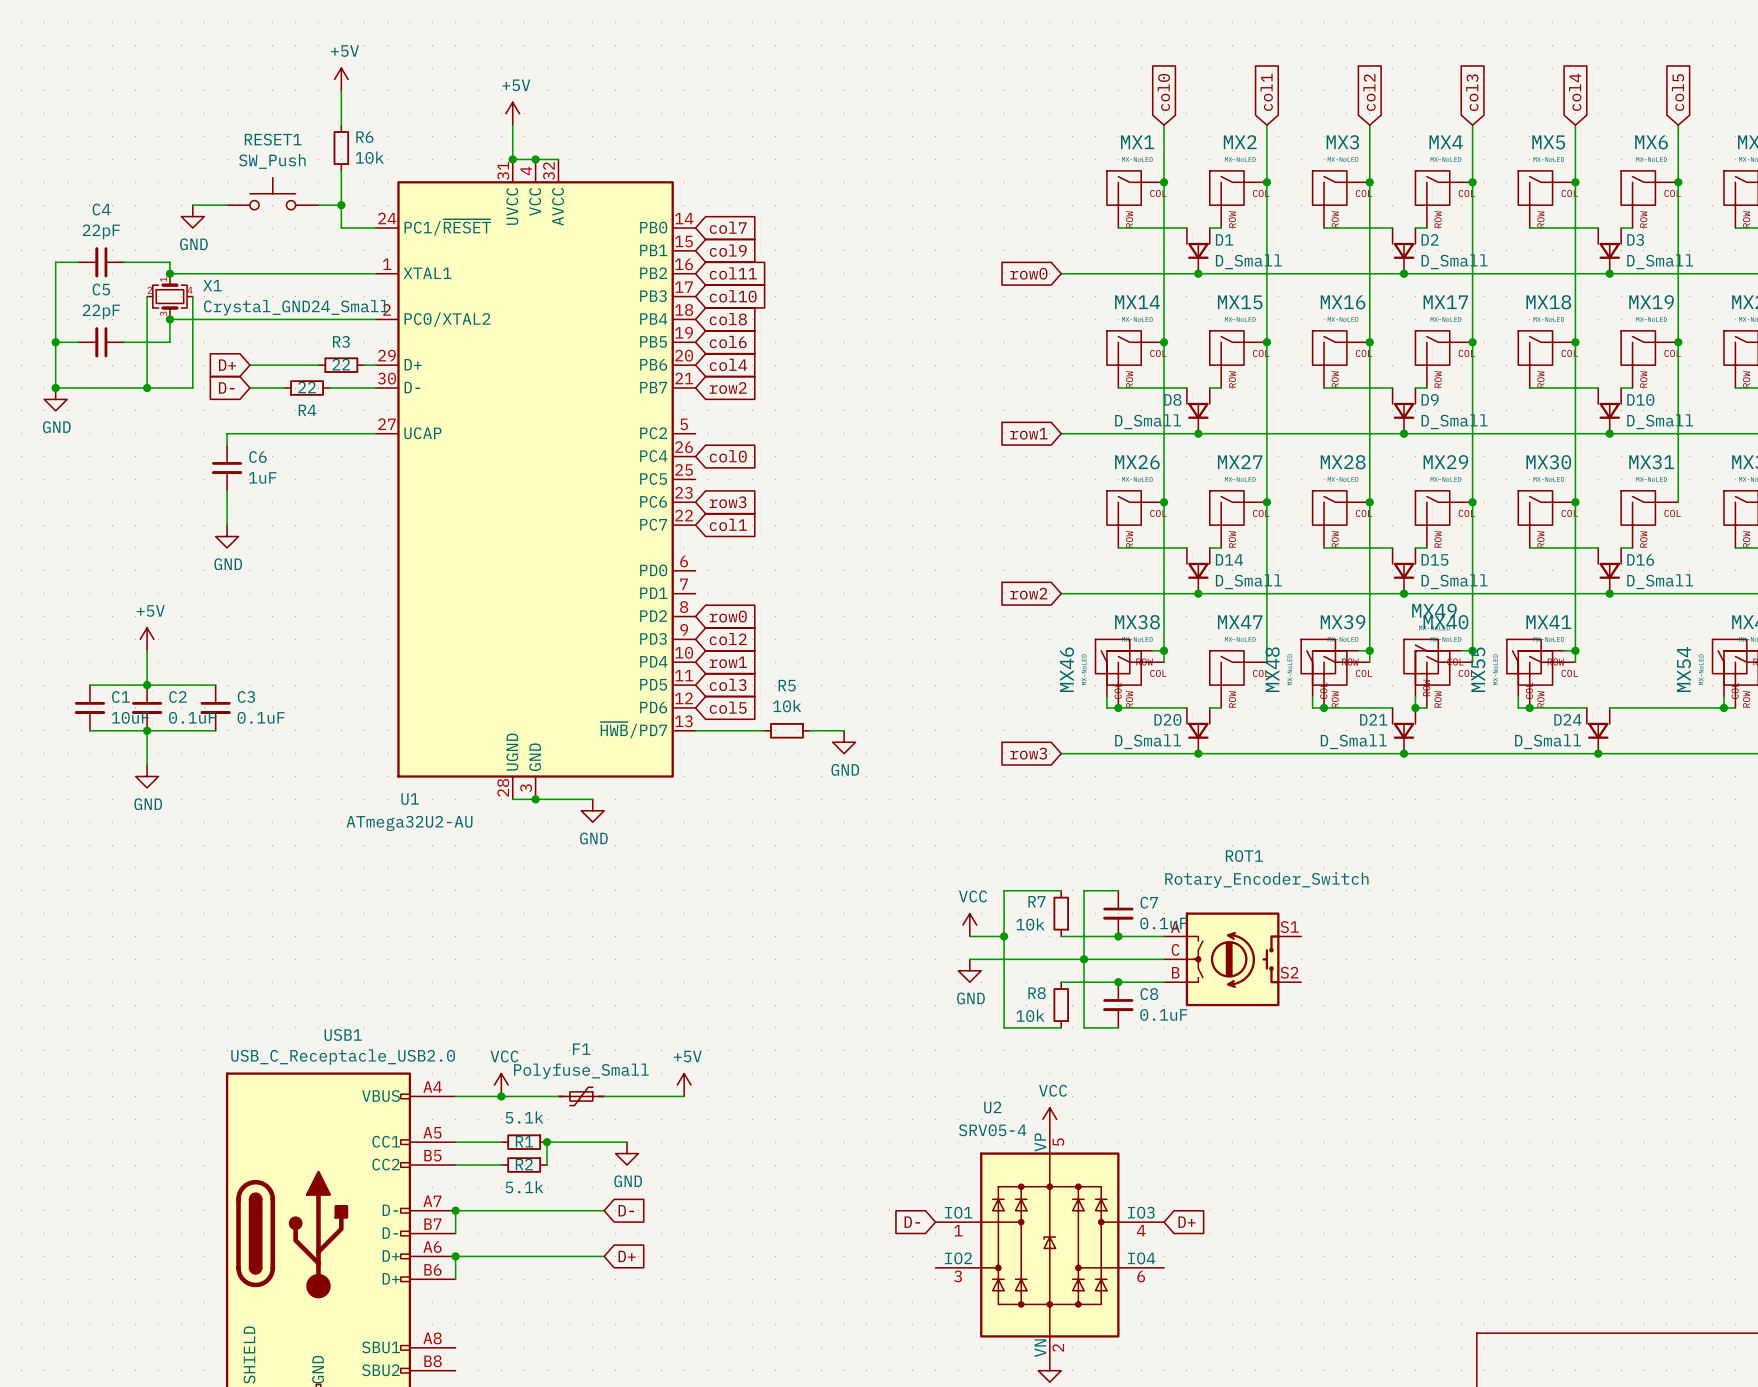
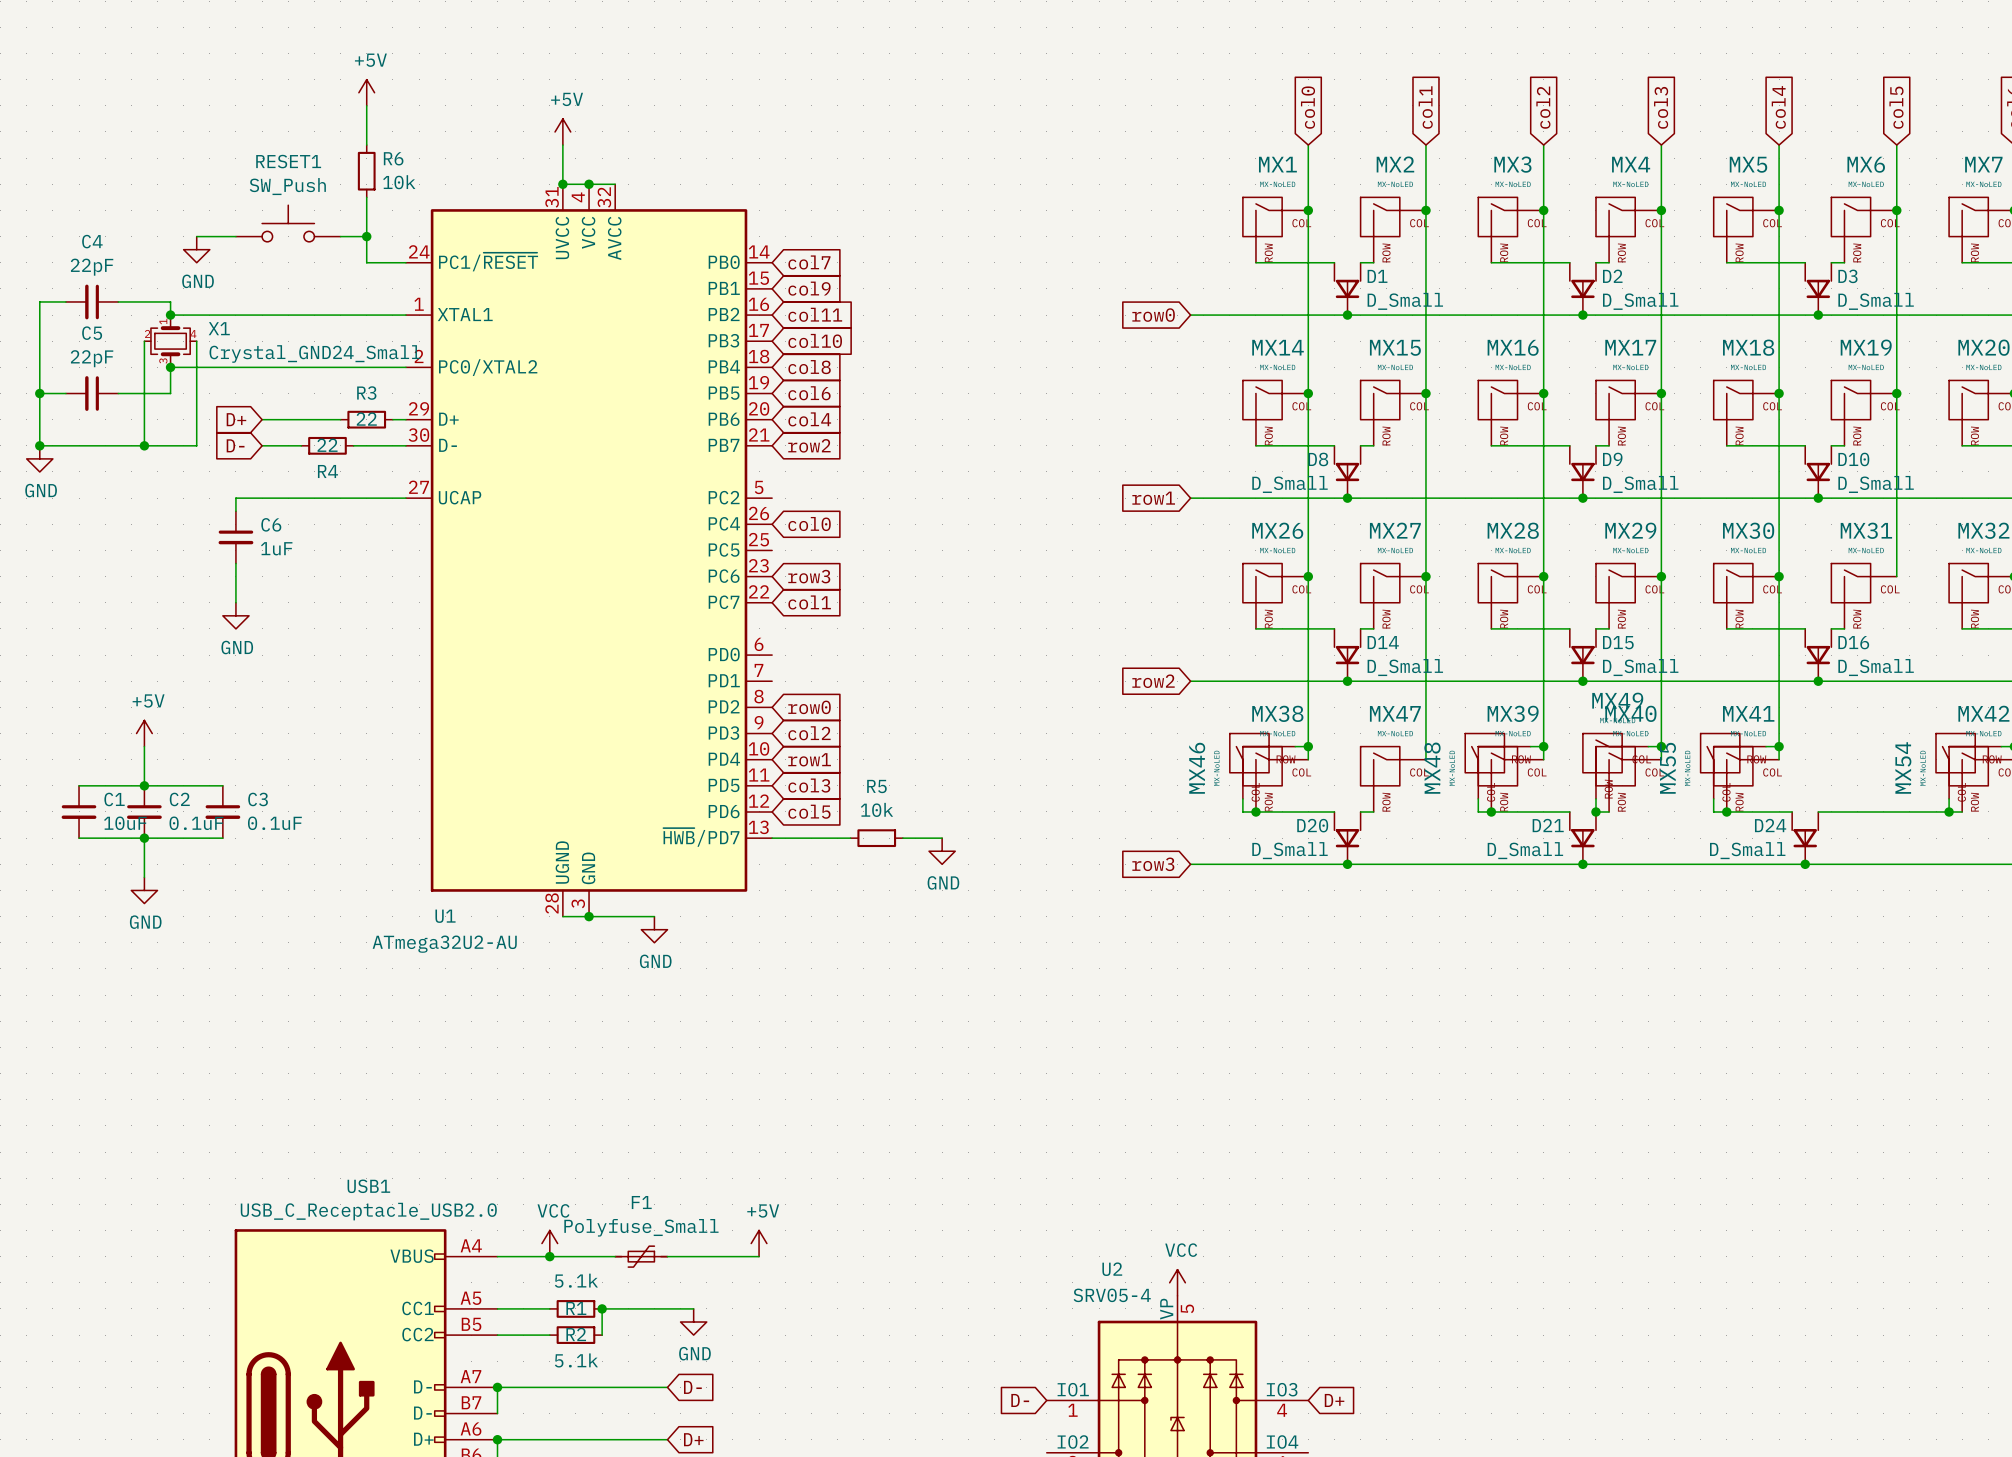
wire: (1061, 890) (1004, 890) (1004, 1027) (1061, 1027) -> none
wire: (1118, 890) (1084, 890) (1084, 1027) (1118, 1027) -> none
R7: 10k (1061, 913) -> none
C7: 0.1uF (1118, 913) -> none
power symbol: VCC (969, 925) -> none
wire: (969, 936) (1004, 936) -> none
junction: (1004, 936) -> none
wire: (1061, 936) (1164, 936) -> none
junction: (1118, 936) -> none
wire: (969, 959) (1164, 959) -> none
junction: (1084, 959) -> none
ROT1: Rotary_Encoder_Switch (1232, 959) -> none
power symbol: GND (969, 970) -> none
wire: (1061, 982) (1164, 982) -> none
junction: (1118, 982) -> none
R8: 10k (1061, 1005) -> none
C8: 0.1uF (1118, 1005) -> none

